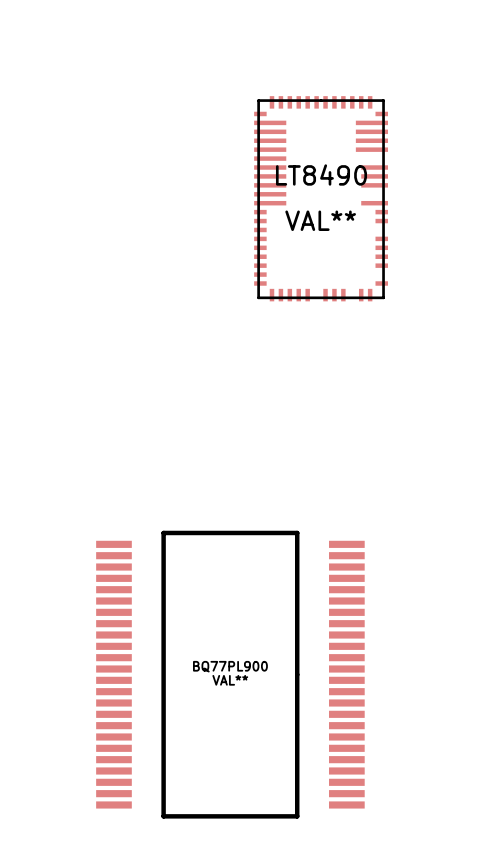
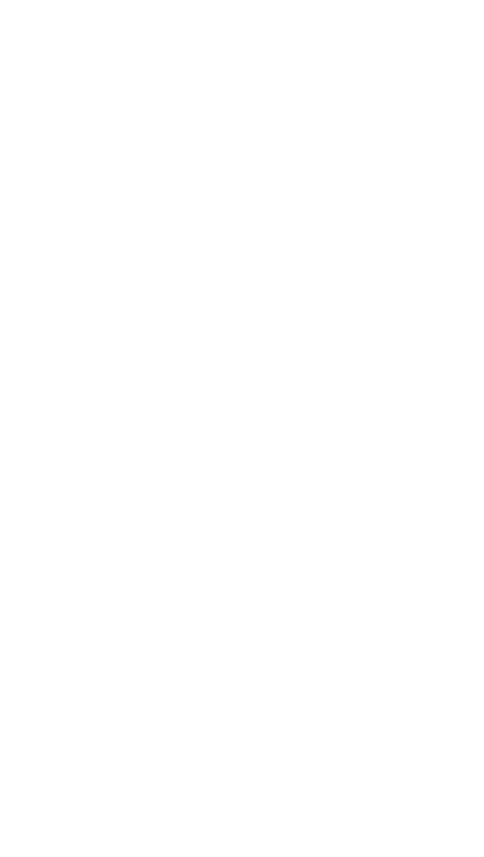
LT8490: VAL** (321, 198) -> none
BQ77PL900: VAL** (230, 674) -> none

